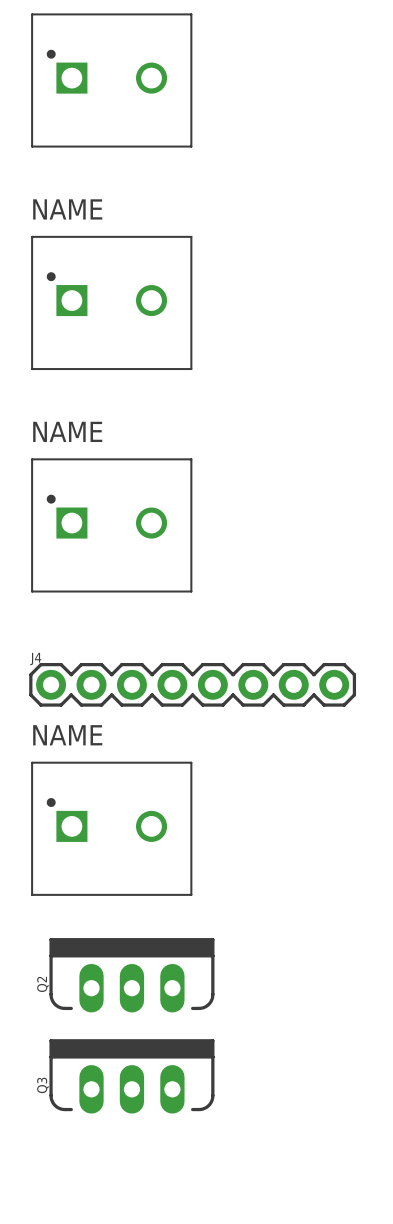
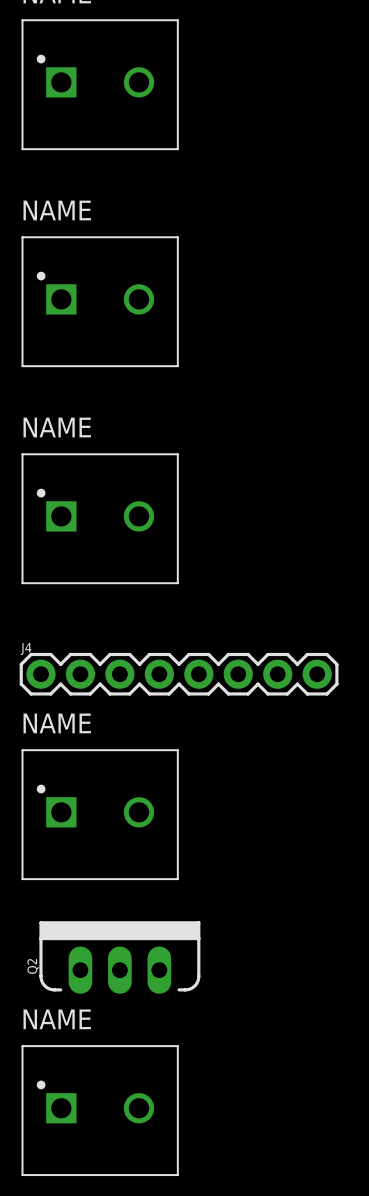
Q3: (131, 1076) -> none
part: none -> (100, 1110)

